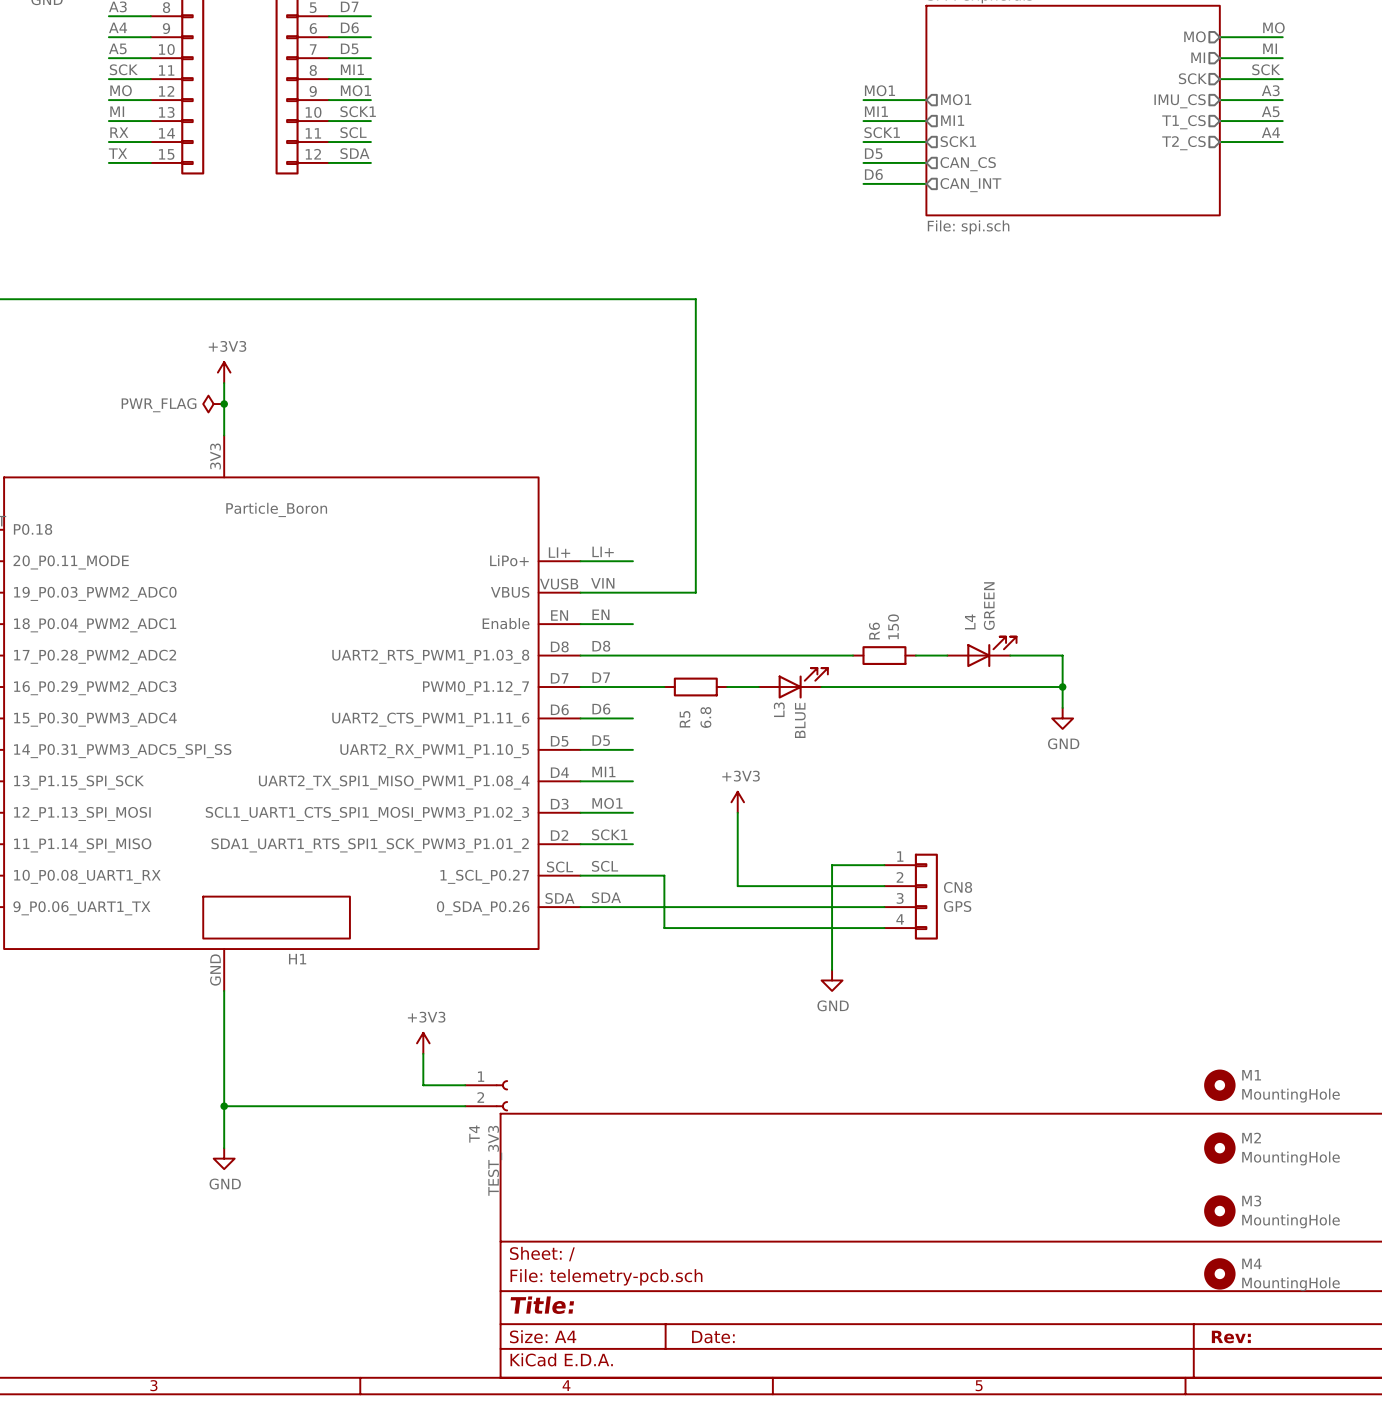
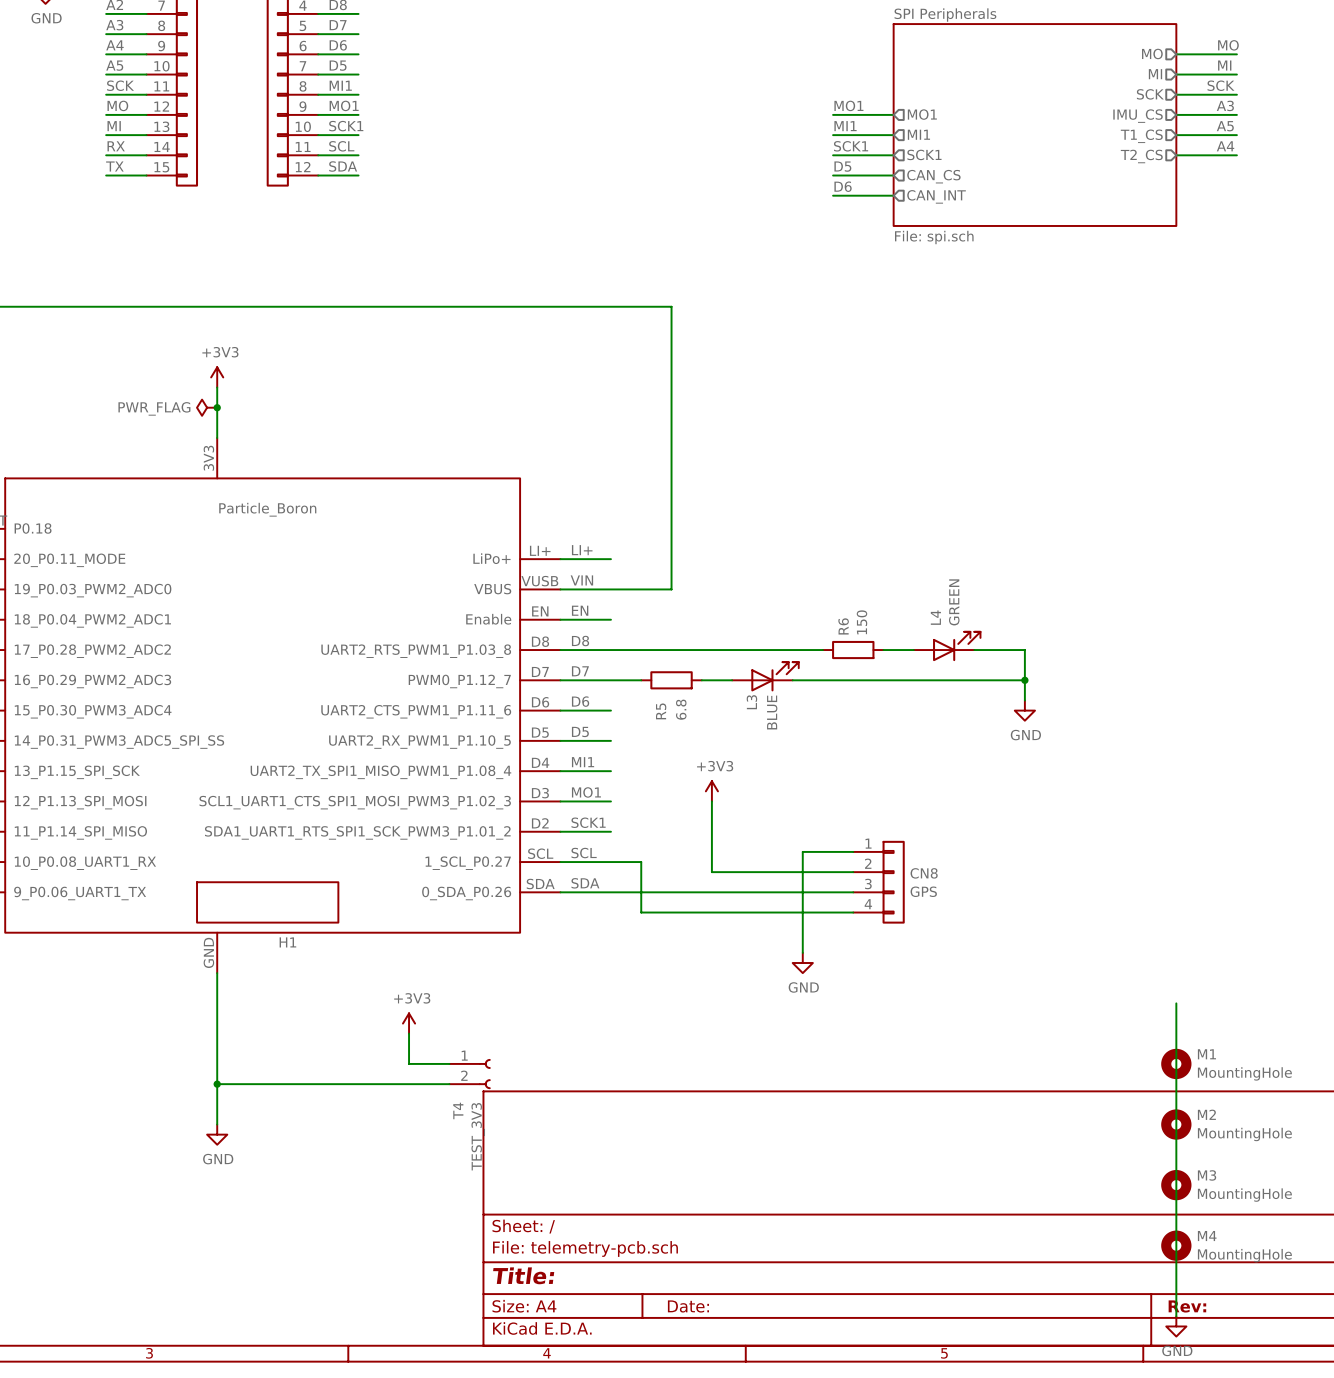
wire: none -> (1176, 1003) (1176, 1316)
power symbol: none -> GND (1176, 1326)

